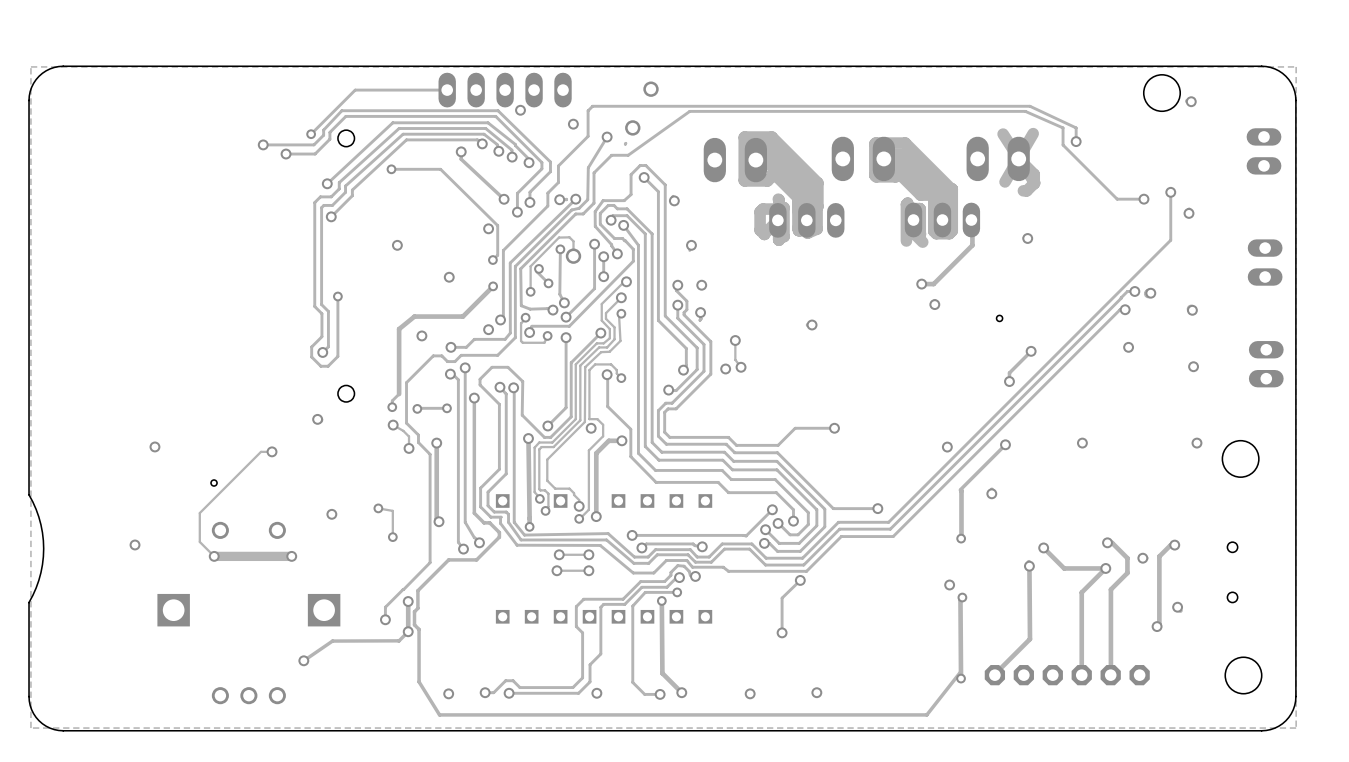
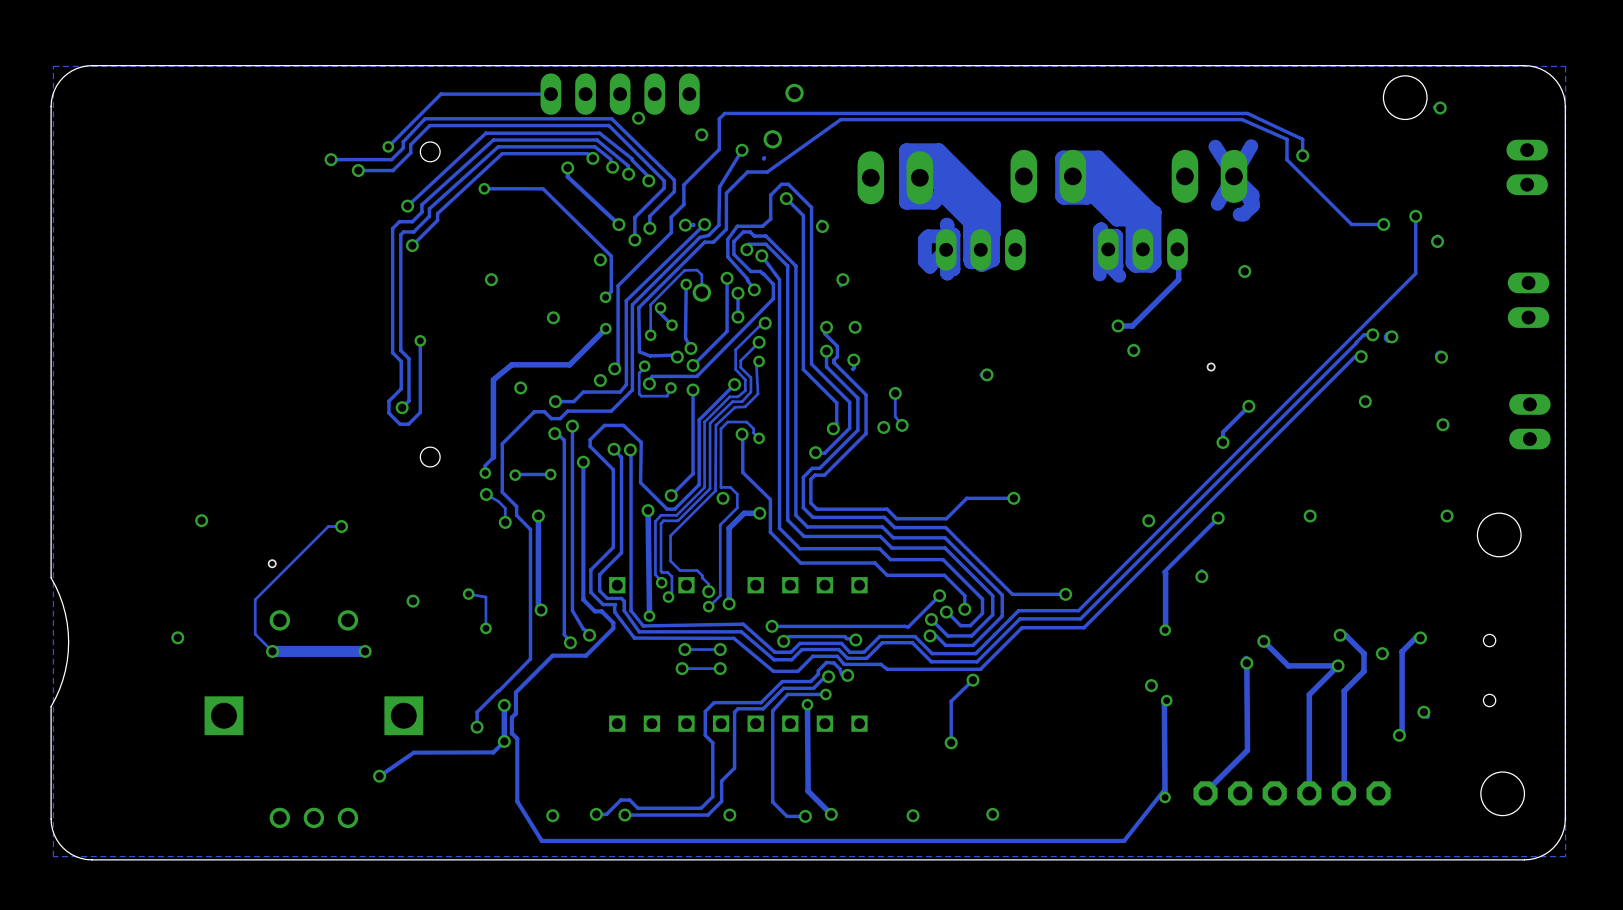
via: (317, 419) -> none

